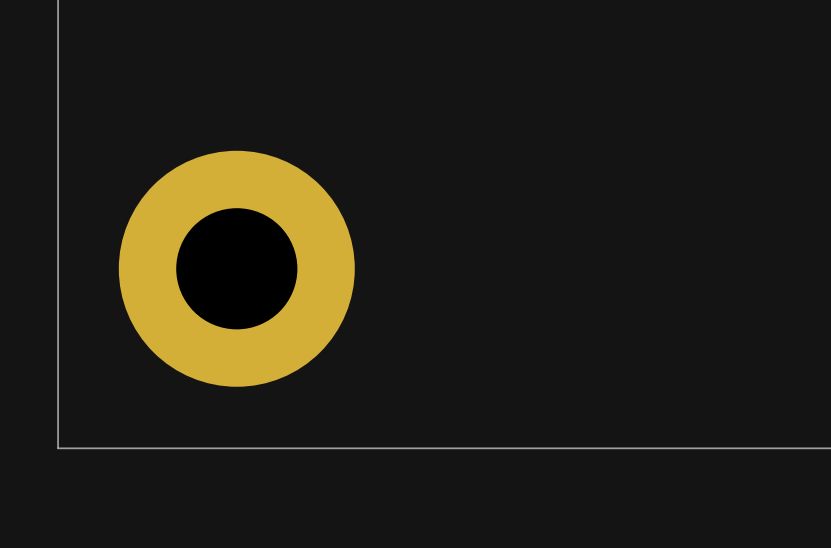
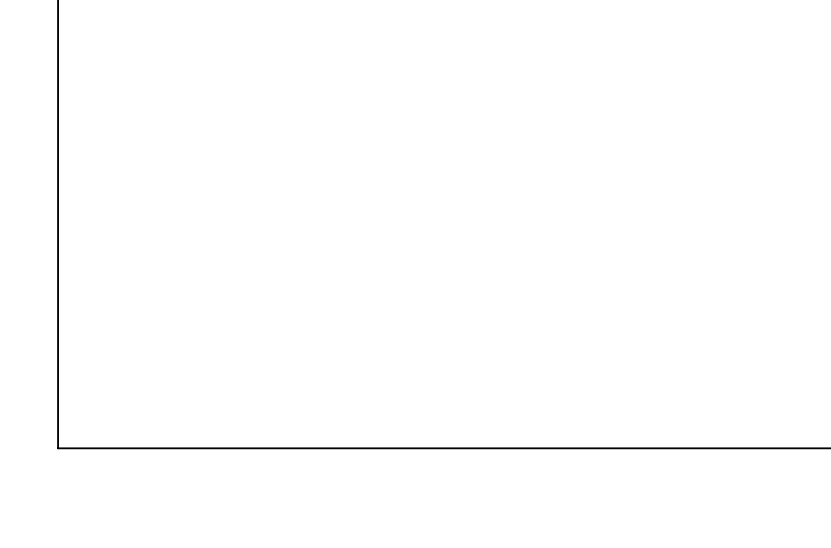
part: (236, 268) -> none

